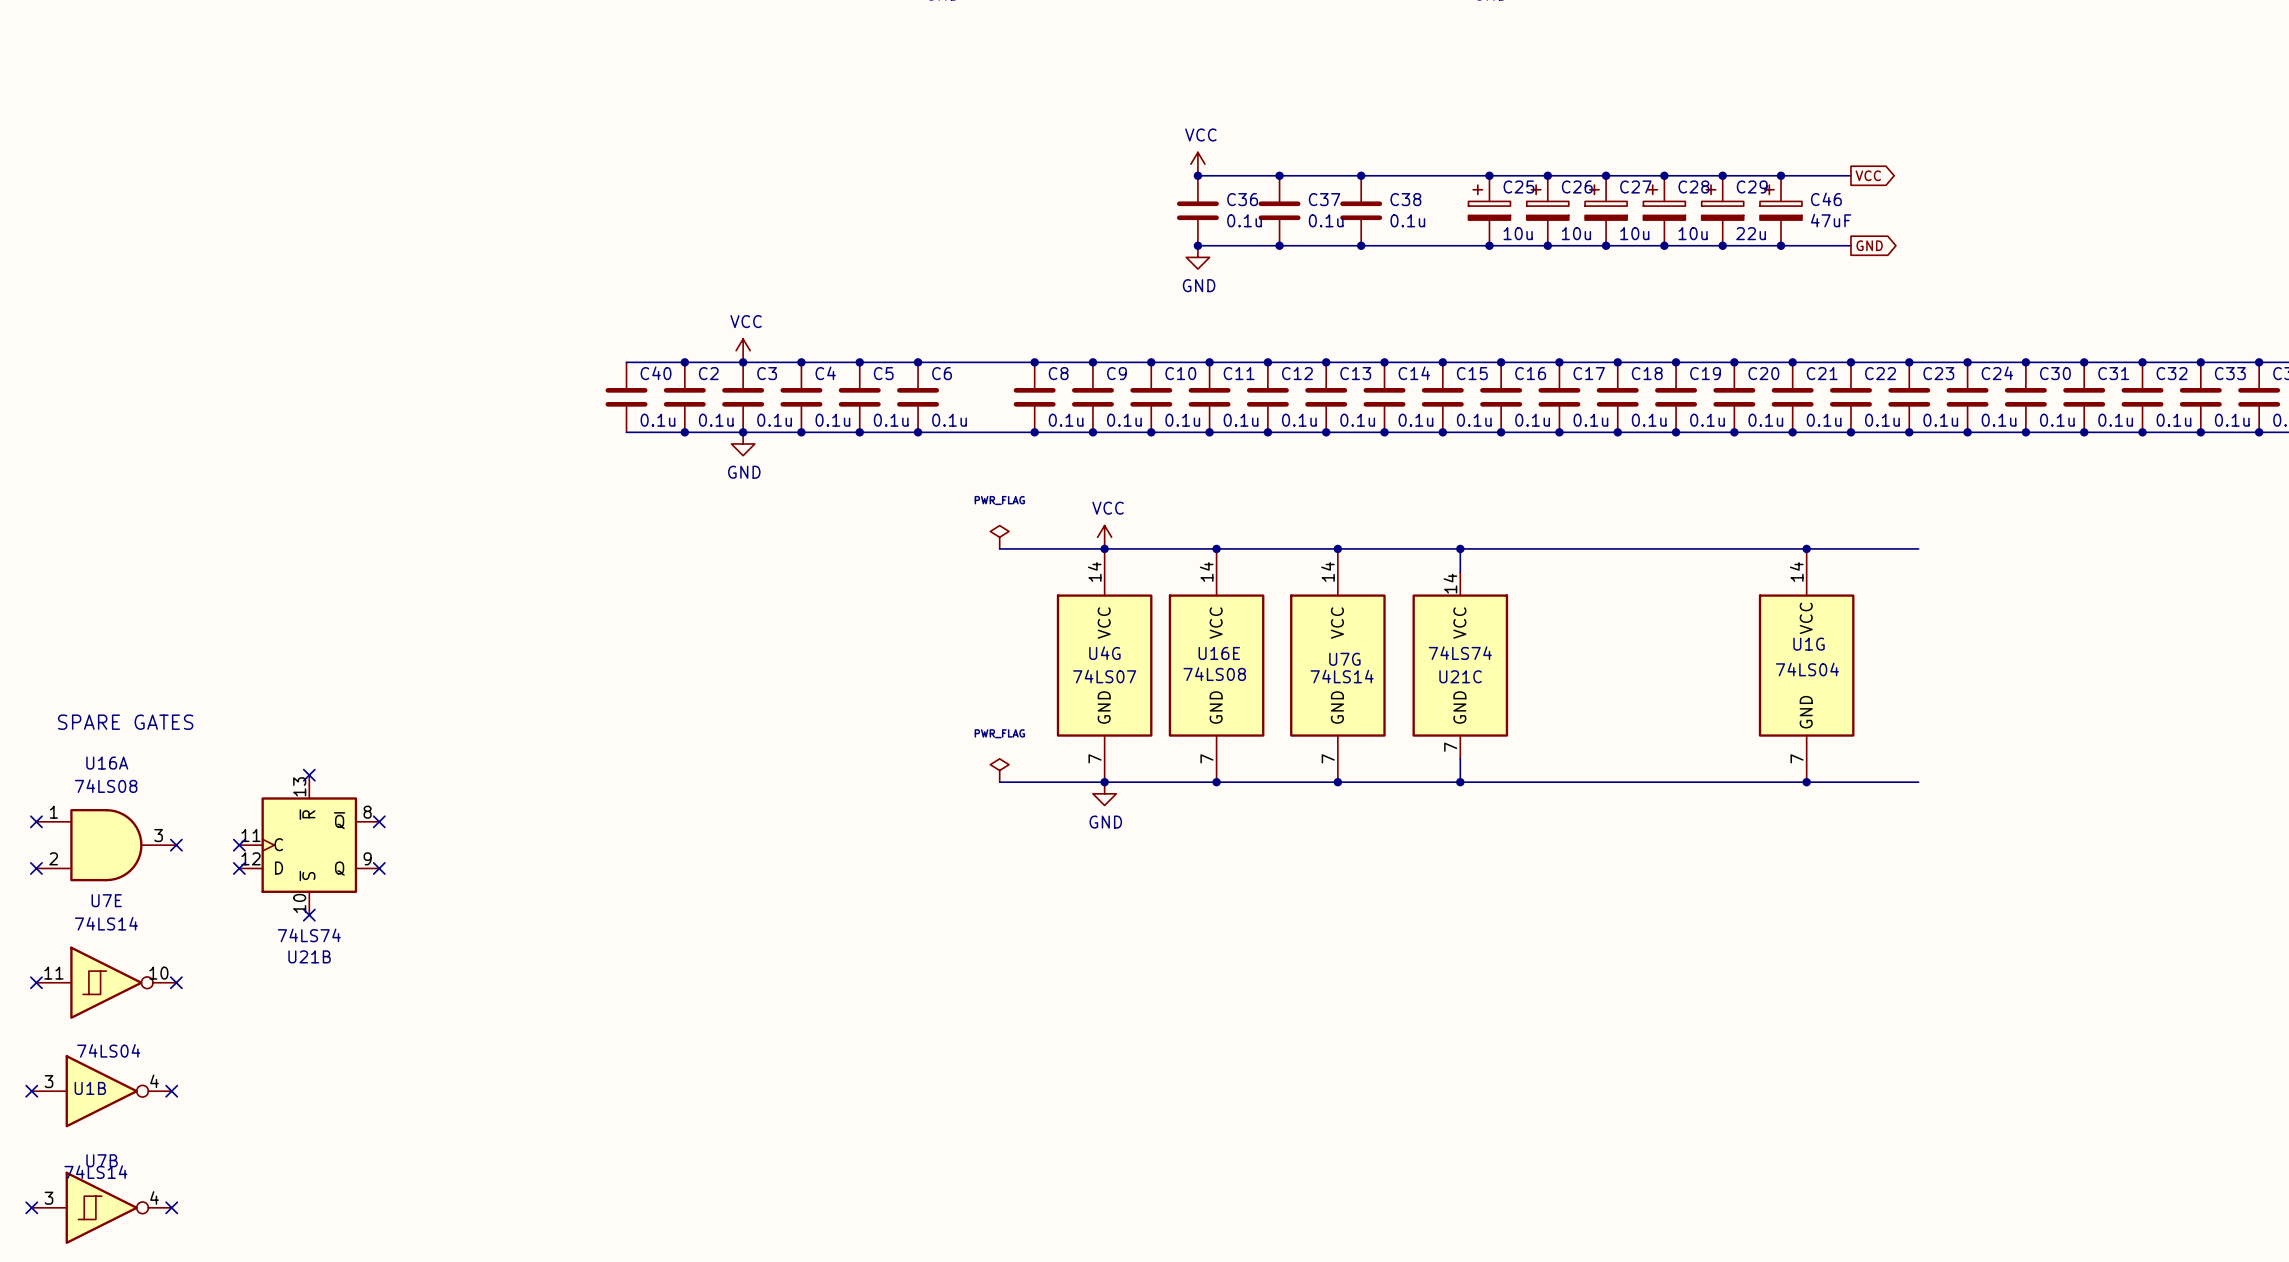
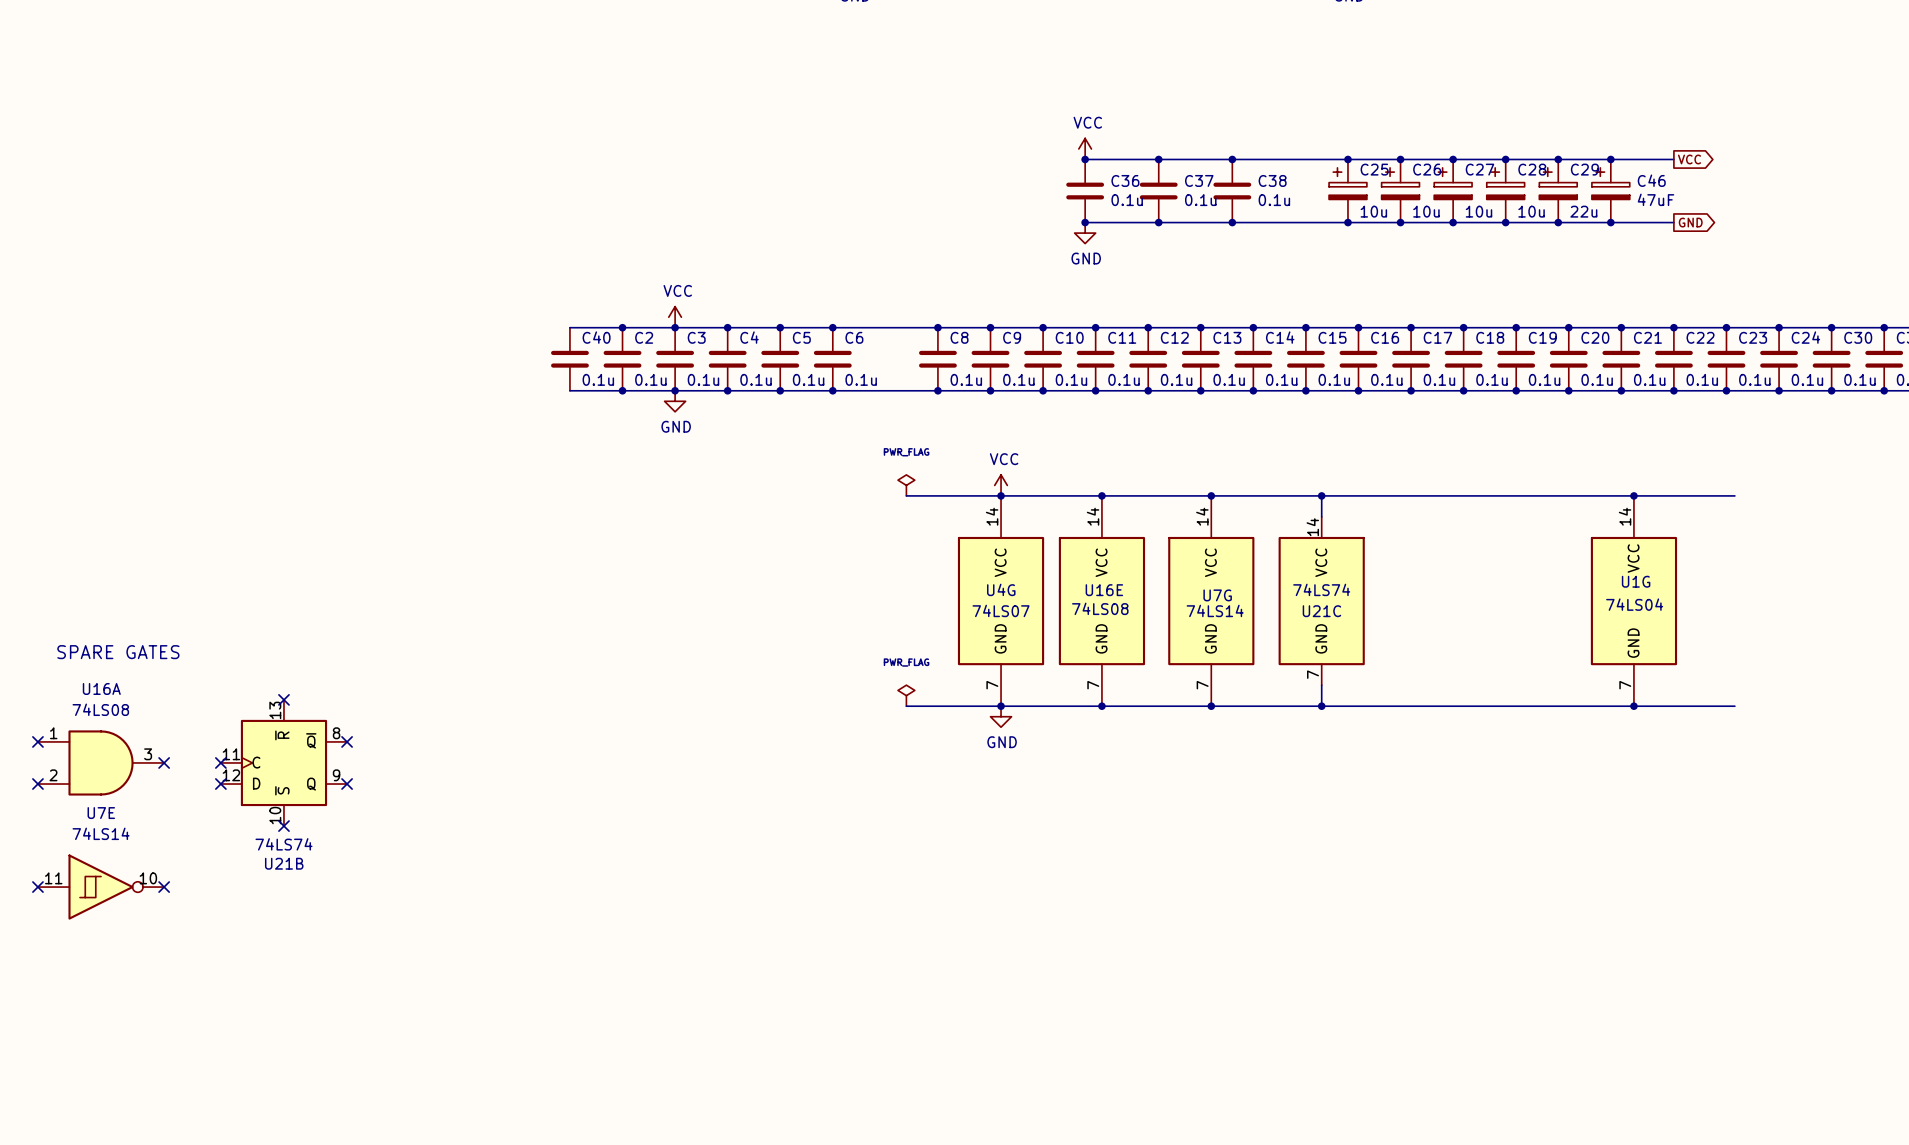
no-connect mark: (31, 1091) -> none
U1B: 74LS04 (101, 1091) -> none
no-connect mark: (171, 1091) -> none
no-connect mark: (31, 1207) -> none
U7B: 74LS14 (101, 1207) -> none
no-connect mark: (171, 1207) -> none

